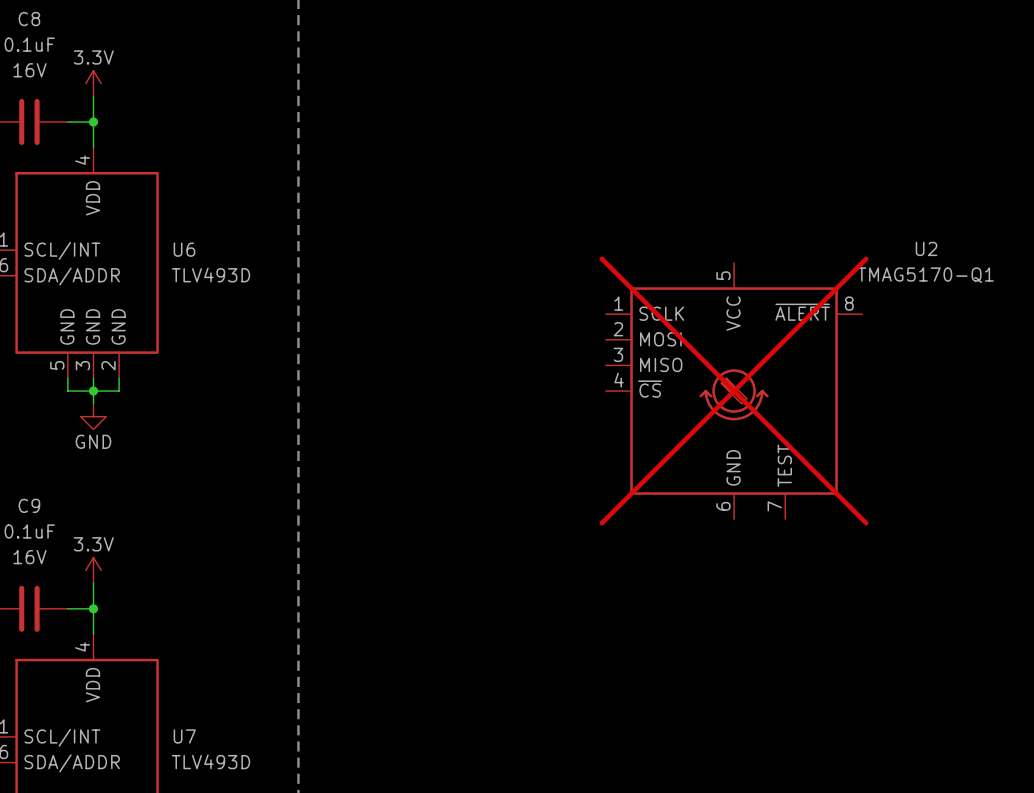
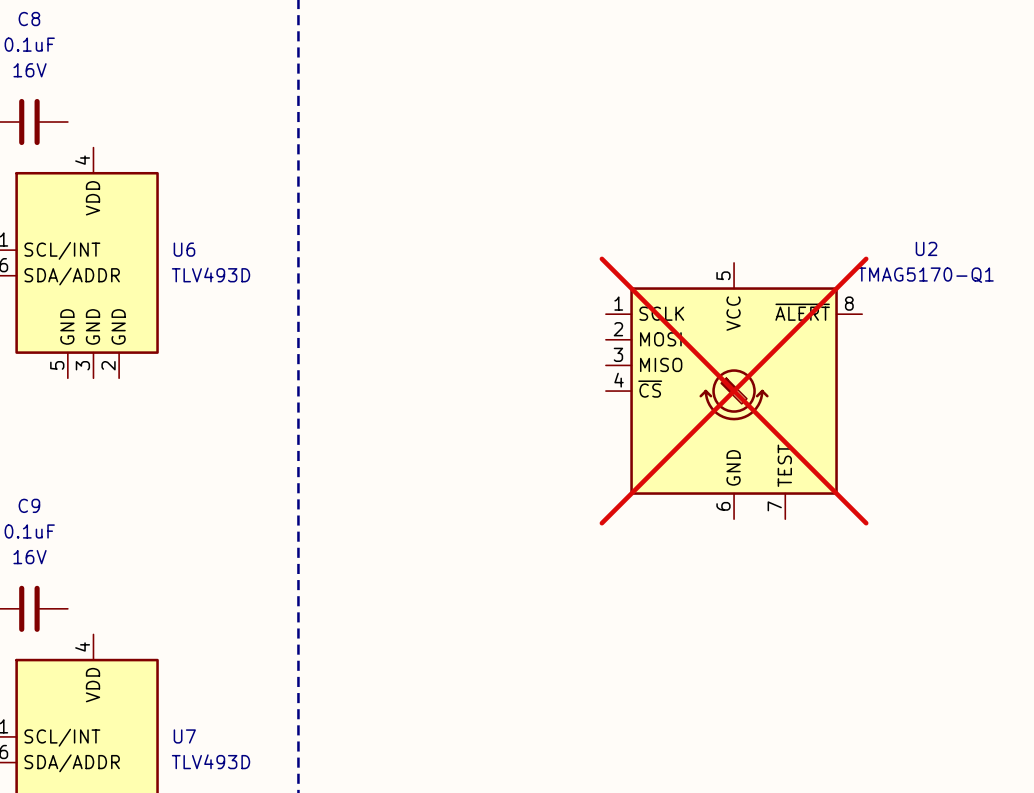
power symbol: 3.3V (93, 83) -> none
wire: (93, 96) (93, 147) -> none
wire: (67, 122) (93, 122) -> none
junction: (93, 122) -> none
wire: (67, 378) (67, 391) (119, 391) (119, 378) -> none
wire: (93, 378) (93, 403) -> none
junction: (93, 391) -> none
power symbol: GND (93, 416) -> none
power symbol: 3.3V (93, 570) -> none
wire: (93, 583) (93, 634) -> none
wire: (67, 608) (93, 608) -> none
junction: (93, 608) -> none

